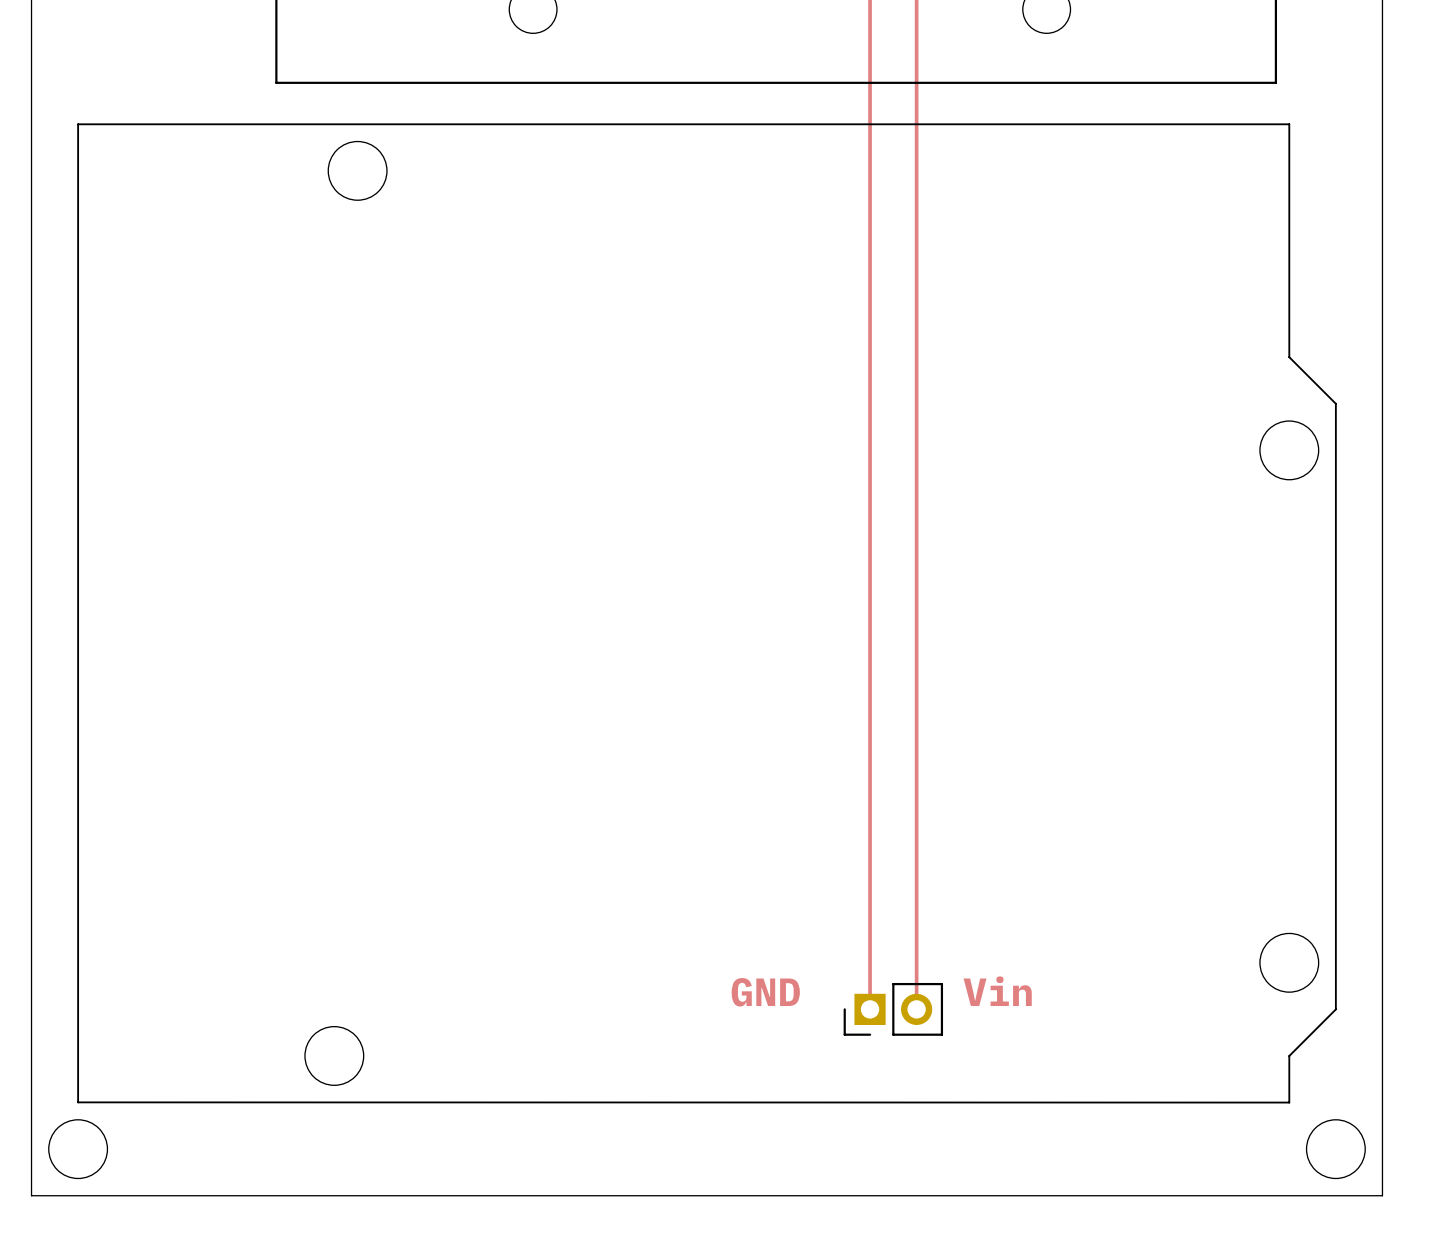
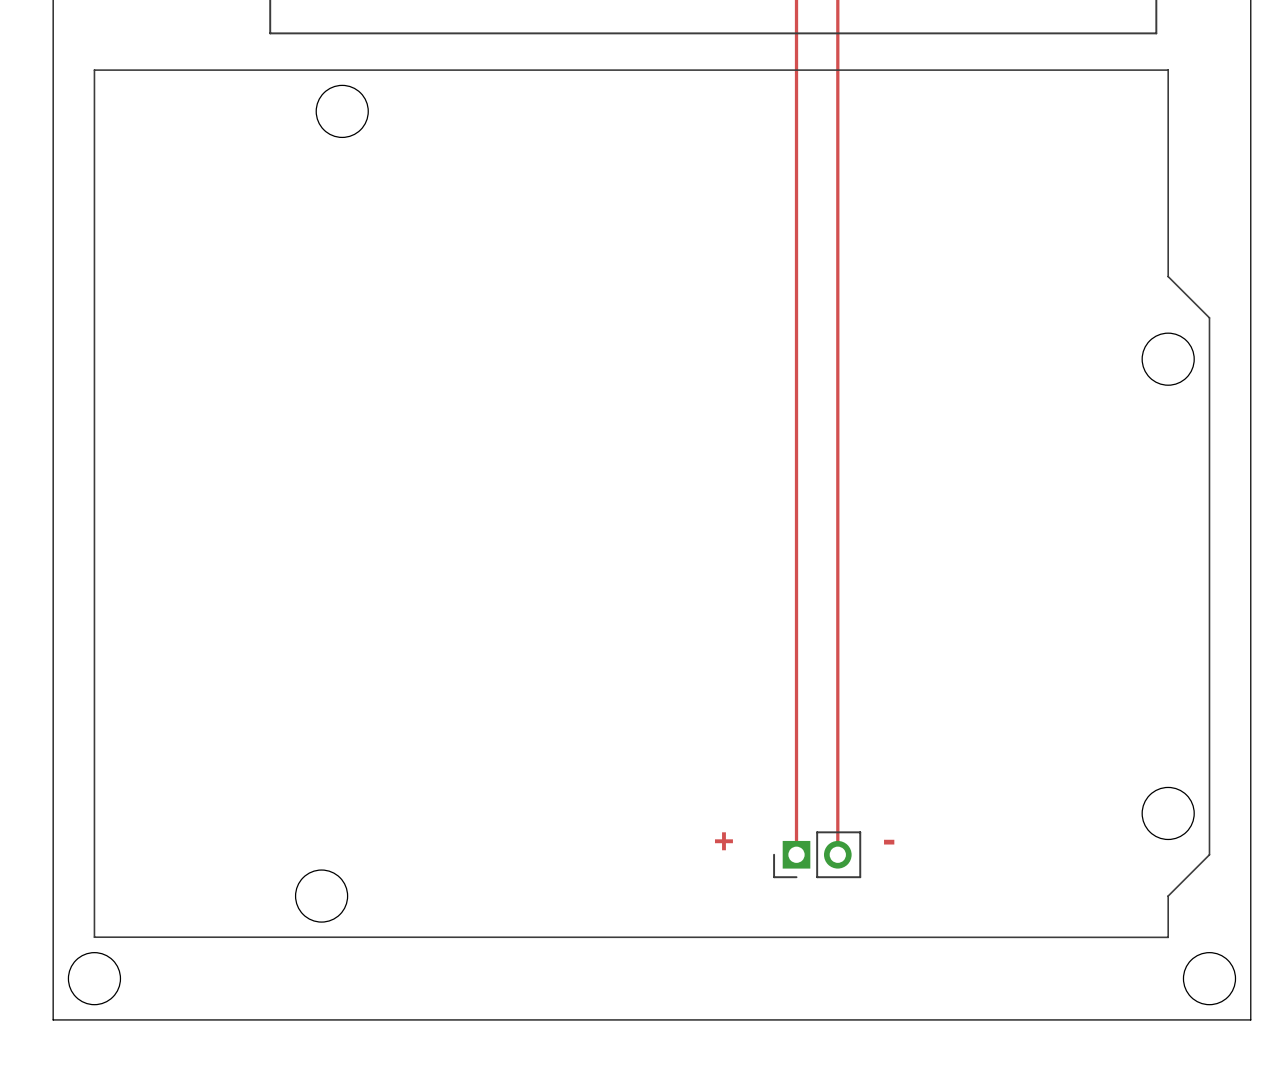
text: Vin (997, 991) -> - (889, 842)
text: GND (765, 992) -> none
text: none -> + (723, 841)

